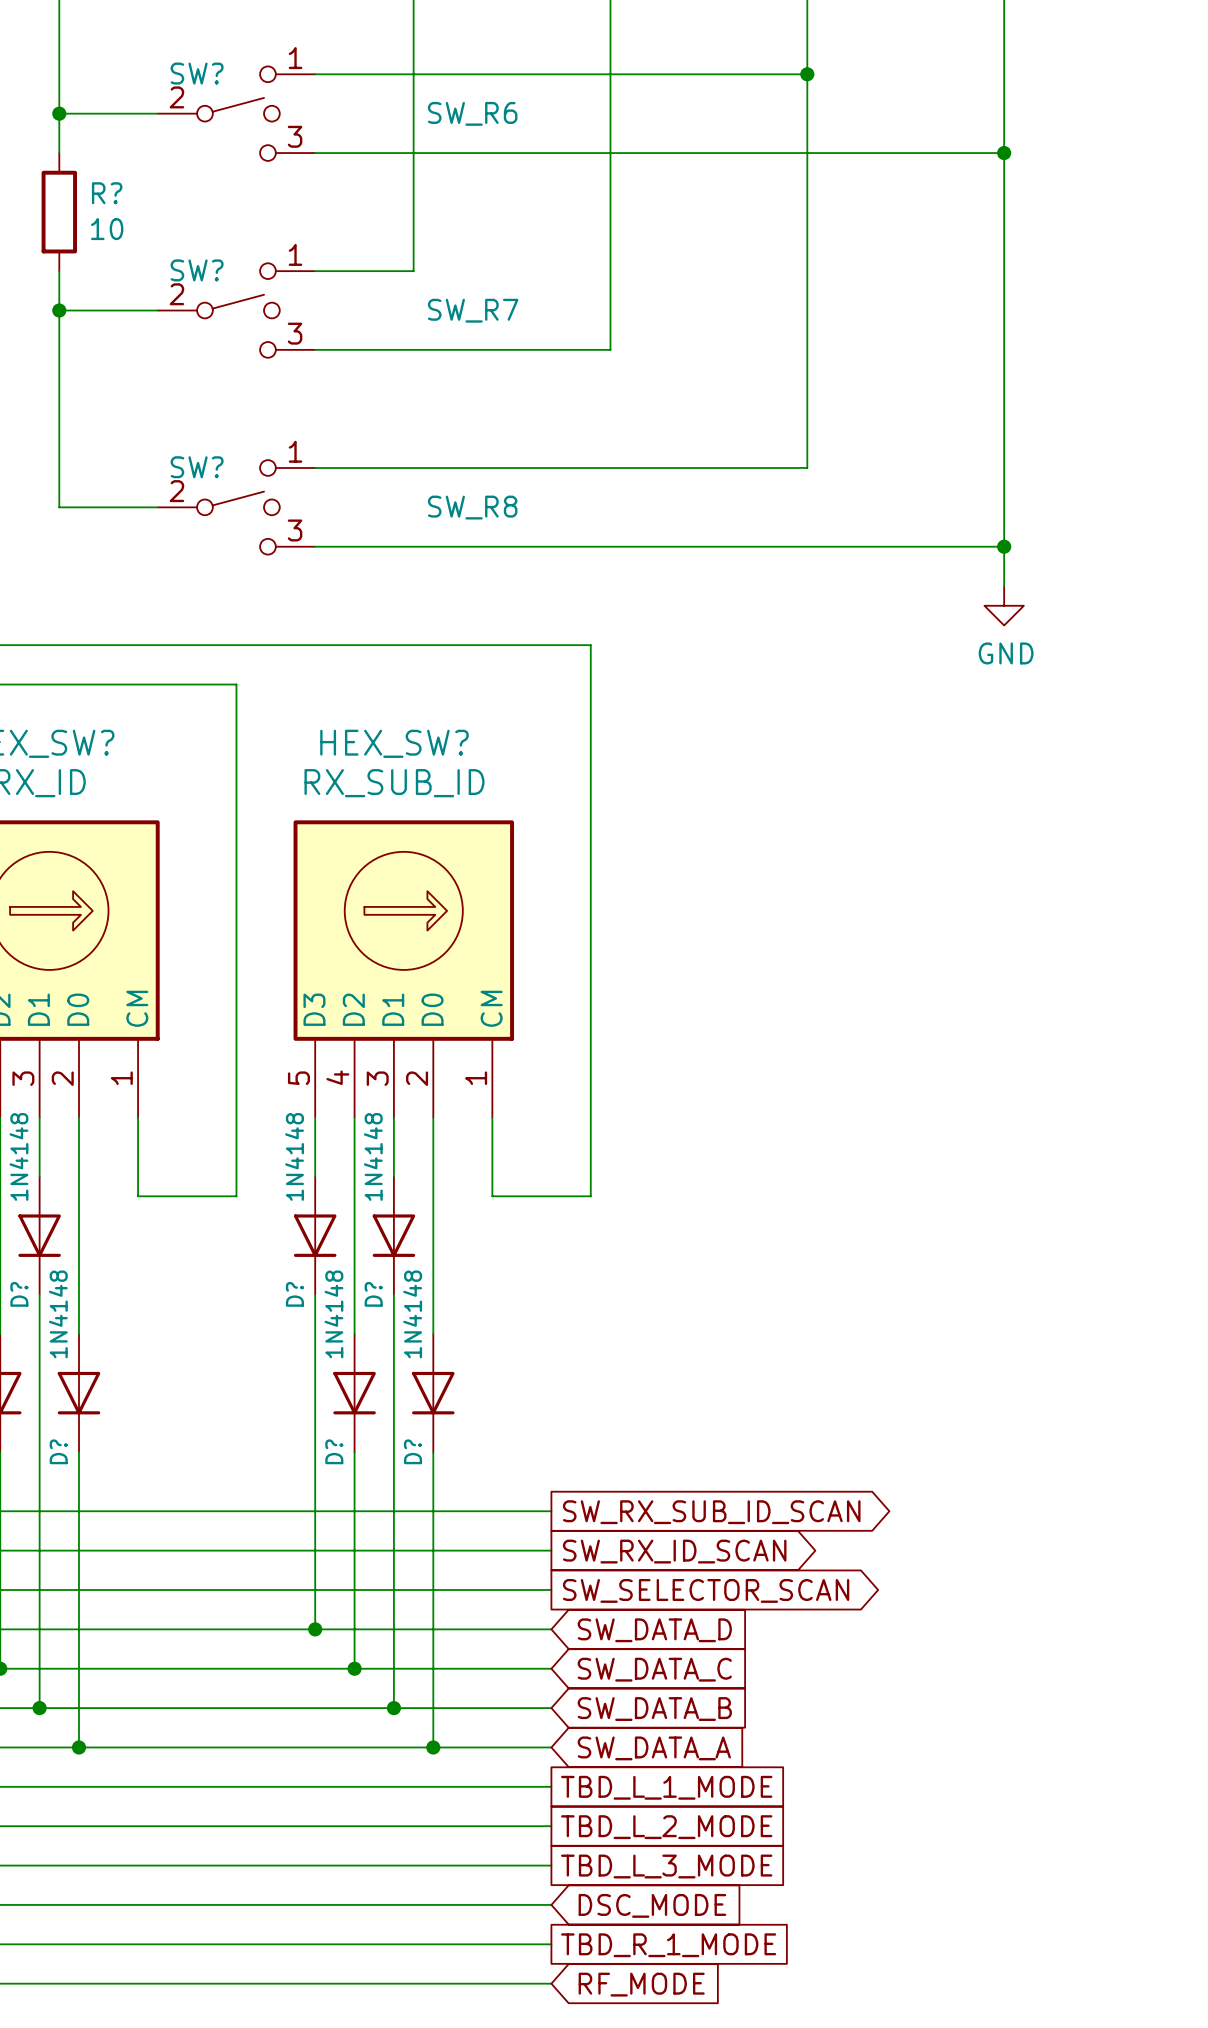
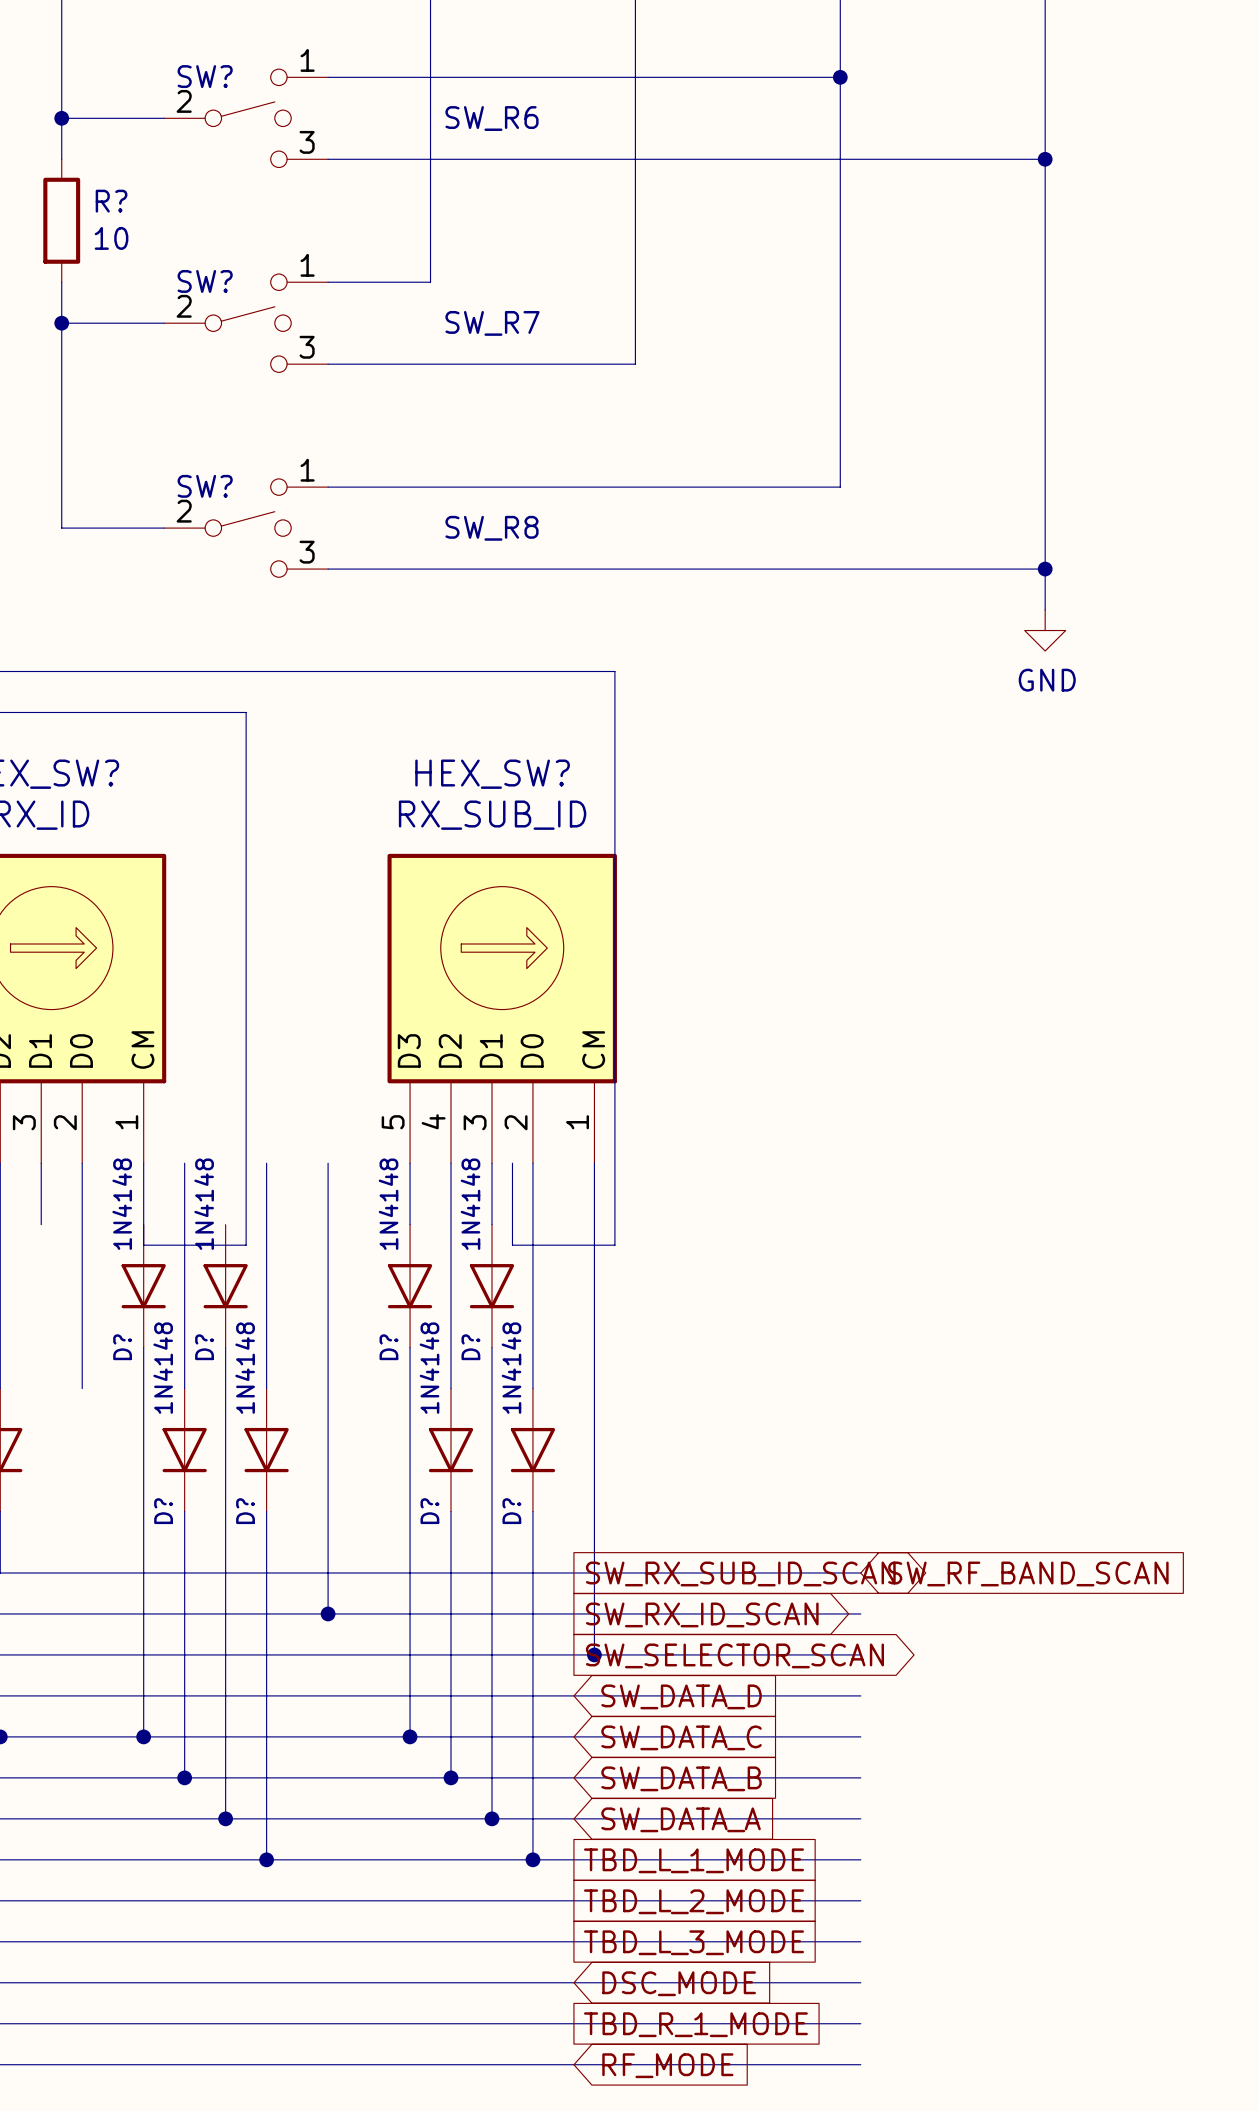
HEX_SW? position: (403, 968) -> (502, 1008)
wire: none -> (184, 1163) (184, 1388)
wire: (354, 1117) (354, 1334) -> (266, 1163) (266, 1388)
wire: none -> (491, 1163) (491, 1224)
wire: none -> (594, 1163) (594, 1654)
D?: 1N4148 (39, 1235) -> none
D?: none -> 1N4148 (143, 1286)
D?: none -> 1N4148 (225, 1286)
D?: 1N4148 (315, 1235) -> none
D?: none -> 1N4148 (491, 1286)
wire: (39, 1294) (39, 1708) -> none
wire: none -> (143, 1347) (143, 1736)
wire: none -> (225, 1347) (225, 1818)
wire: none -> (491, 1347) (491, 1818)
D?: 1N4148 (78, 1393) -> none
D?: none -> 1N4148 (184, 1450)
D?: none -> 1N4148 (266, 1450)
D?: 1N4148 (354, 1393) -> none
D?: none -> 1N4148 (532, 1450)
wire: (78, 1452) (78, 1747) -> none
wire: none -> (184, 1511) (184, 1777)
wire: none -> (266, 1511) (266, 1859)
wire: (354, 1452) (354, 1668) -> (532, 1163) (532, 1388)
wire: none -> (532, 1511) (532, 1859)
wire: (0, 1511) (0, 1668) -> none
wire: none -> (573, 1573) (860, 1573)
global label: none -> SW_RF_BAND_SCAN (1028, 1573)
wire: (315, 1550) (315, 1629) -> none
junction: none -> (328, 1613)
wire: none -> (573, 1613) (860, 1613)
wire: none -> (573, 1654) (860, 1654)
junction: none -> (594, 1654)
junction: (315, 1629) -> none
wire: none -> (573, 1695) (860, 1695)
junction: none -> (143, 1736)
junction: (354, 1668) -> none
wire: (393, 1668) (393, 1708) -> none
junction: none -> (410, 1736)
wire: none -> (573, 1736) (860, 1736)
junction: (39, 1708) -> none
junction: none -> (184, 1777)
junction: (393, 1708) -> none
wire: (433, 1708) (433, 1747) -> none
junction: none -> (451, 1777)
wire: none -> (573, 1777) (860, 1777)
junction: (78, 1747) -> none
junction: none -> (225, 1818)
junction: (433, 1747) -> none
junction: none -> (491, 1818)
wire: none -> (573, 1818) (860, 1818)
junction: none -> (266, 1859)
junction: none -> (532, 1859)
wire: none -> (573, 1859) (860, 1859)
wire: none -> (573, 1900) (860, 1900)
wire: none -> (573, 1941) (860, 1941)
wire: none -> (573, 1982) (860, 1982)
wire: none -> (573, 2023) (860, 2023)
wire: none -> (573, 2064) (860, 2064)

